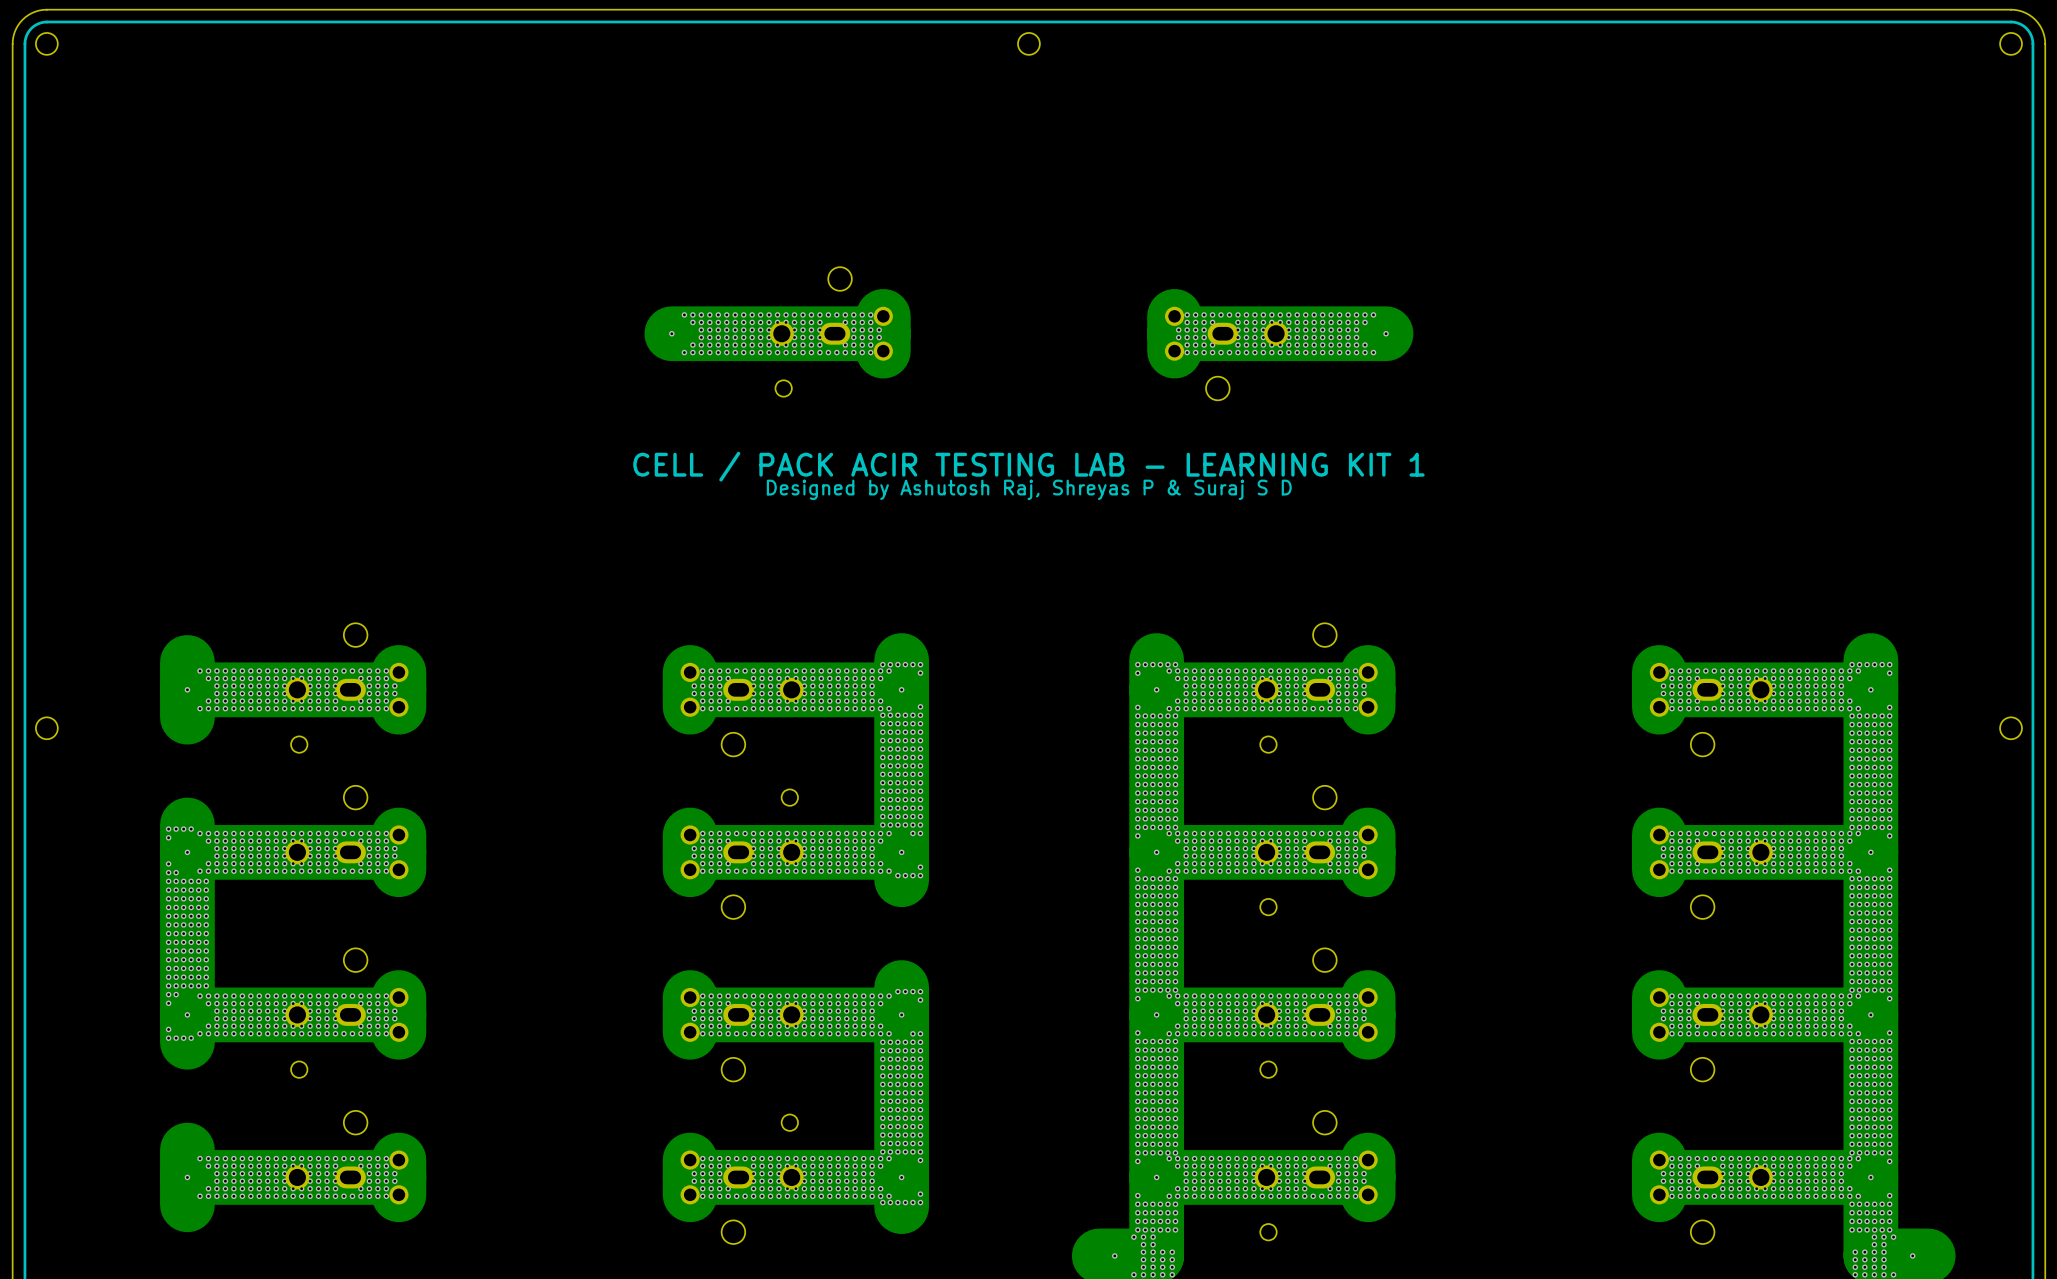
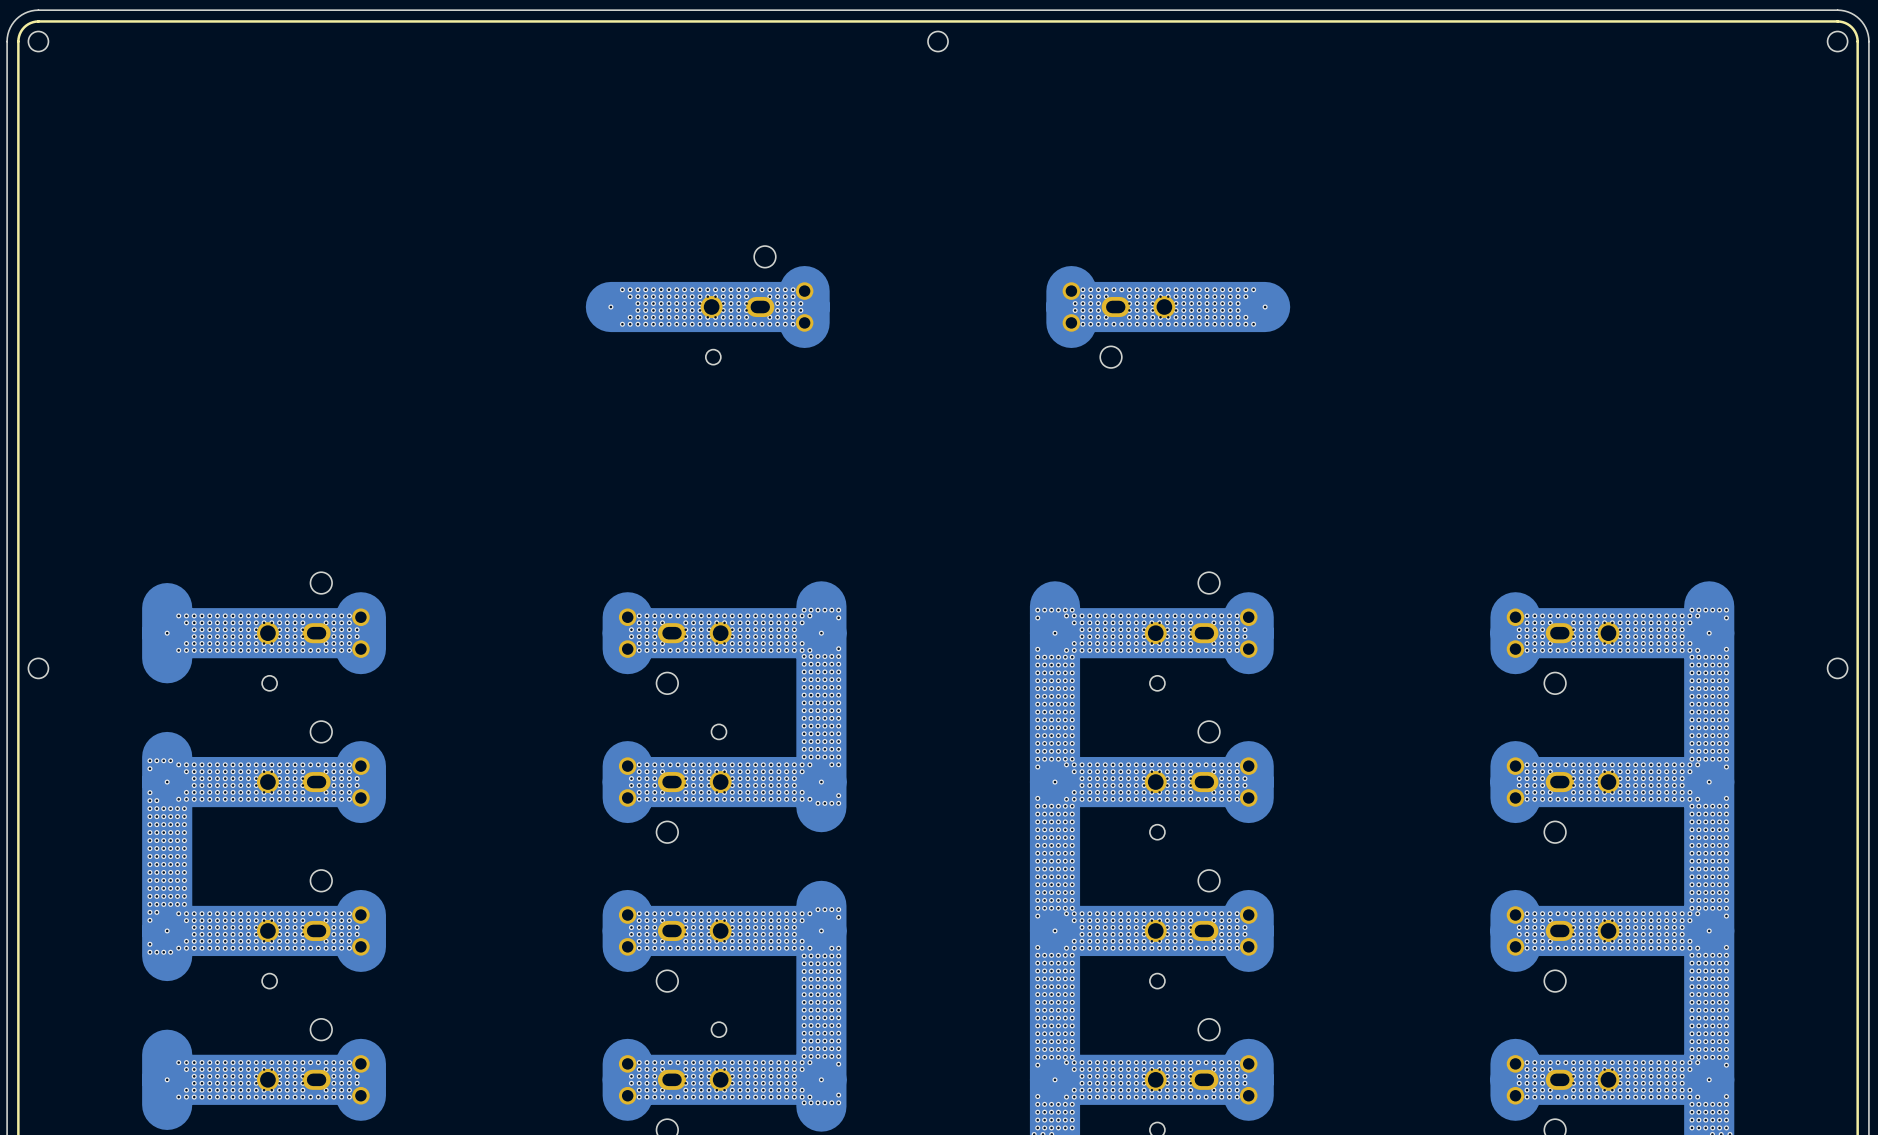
text: CELL / PACK ACIR TESTING LAB - LEARNING KIT 1 (1028, 466) -> none
text: Designed by Ashutosh Raj, Shreyas P & Suraj S D (1029, 489) -> none

